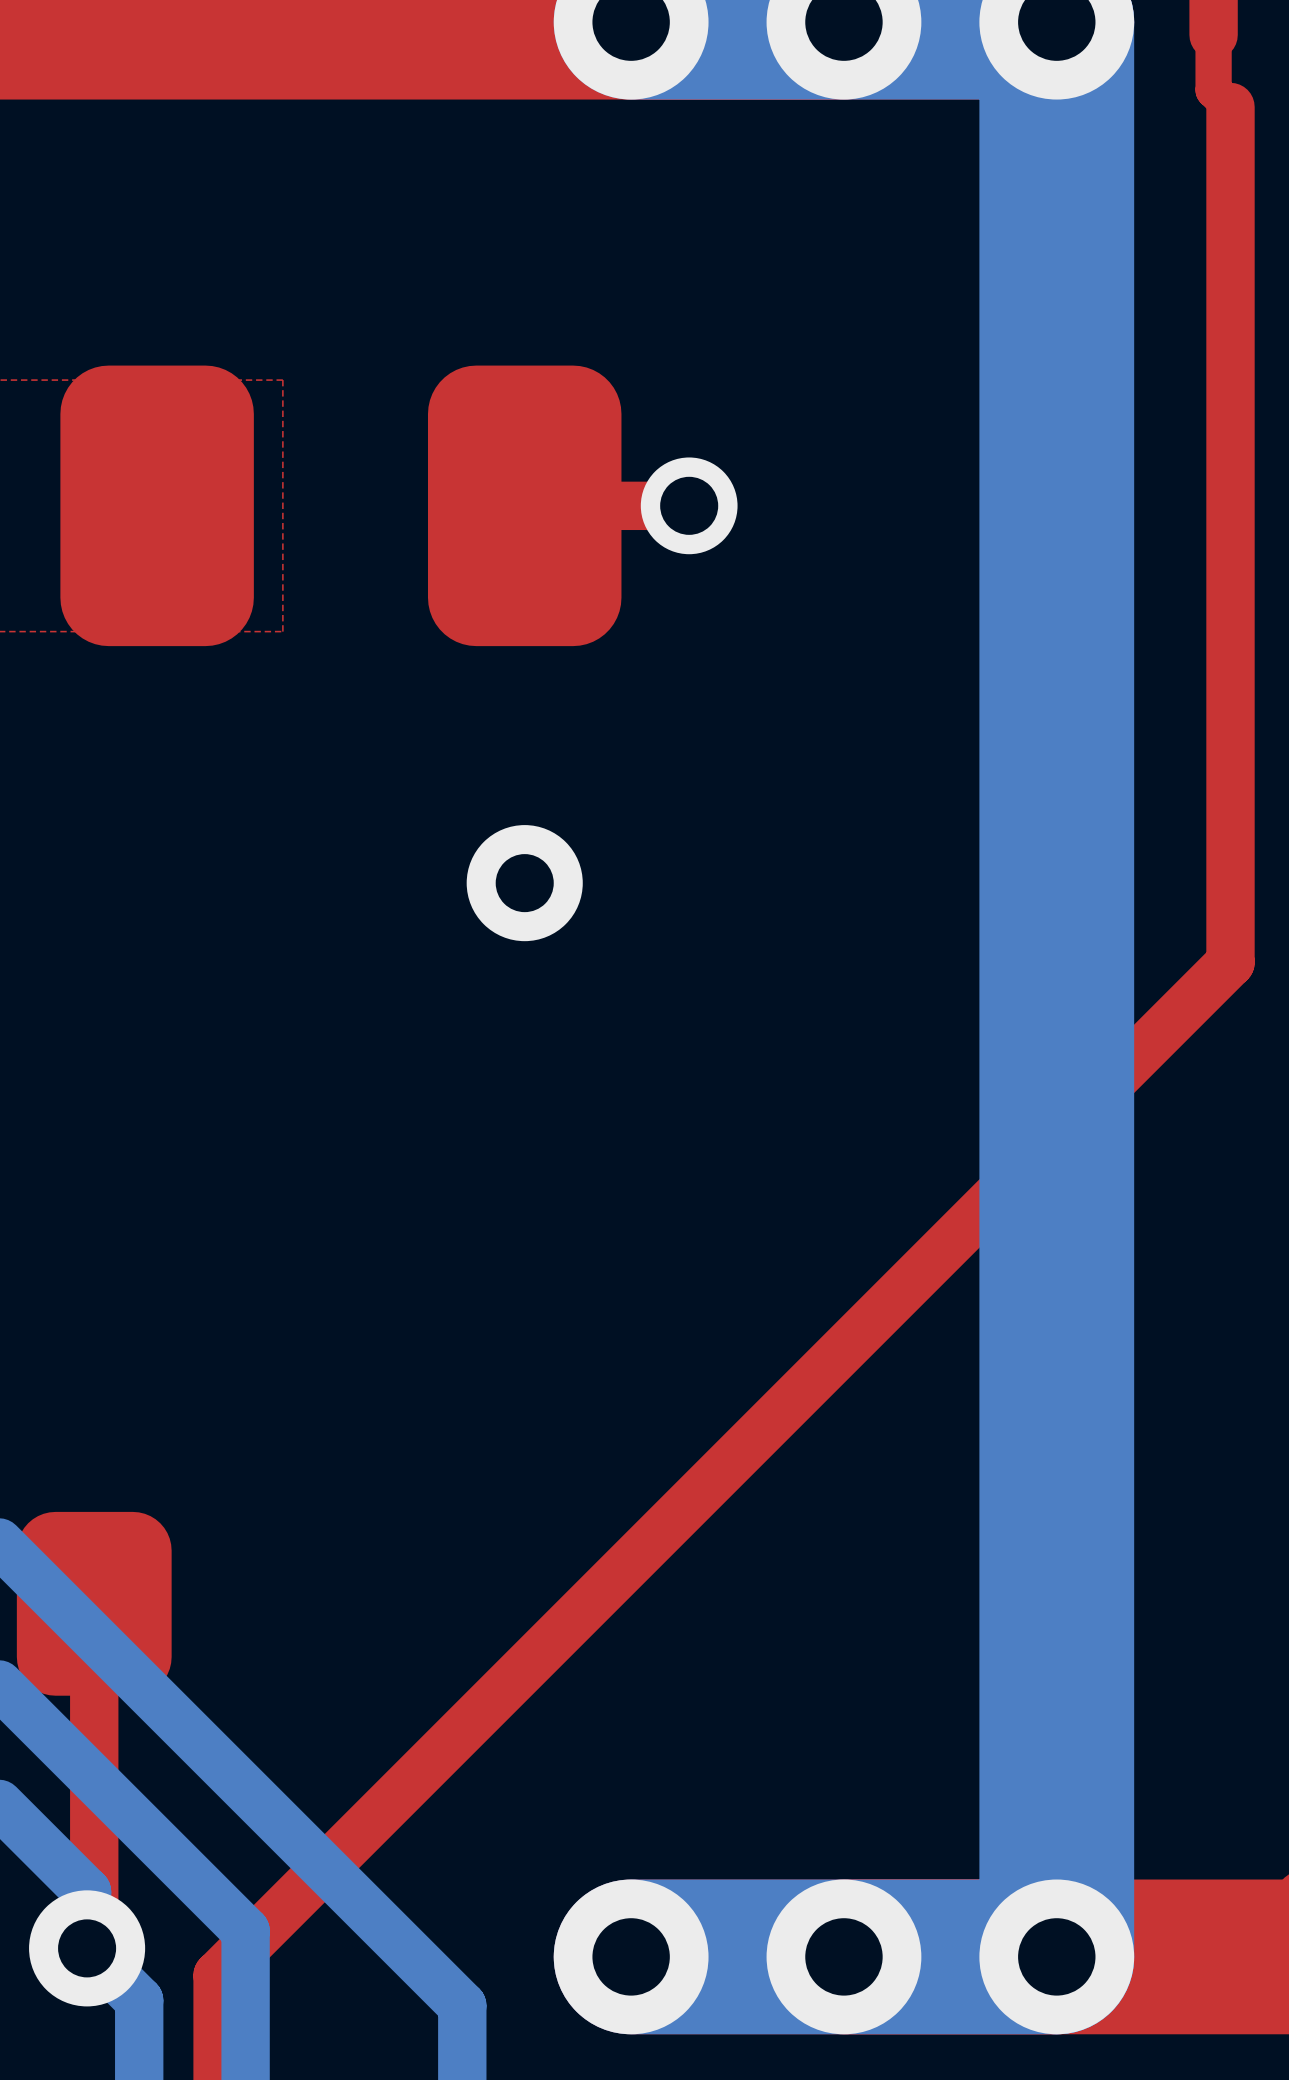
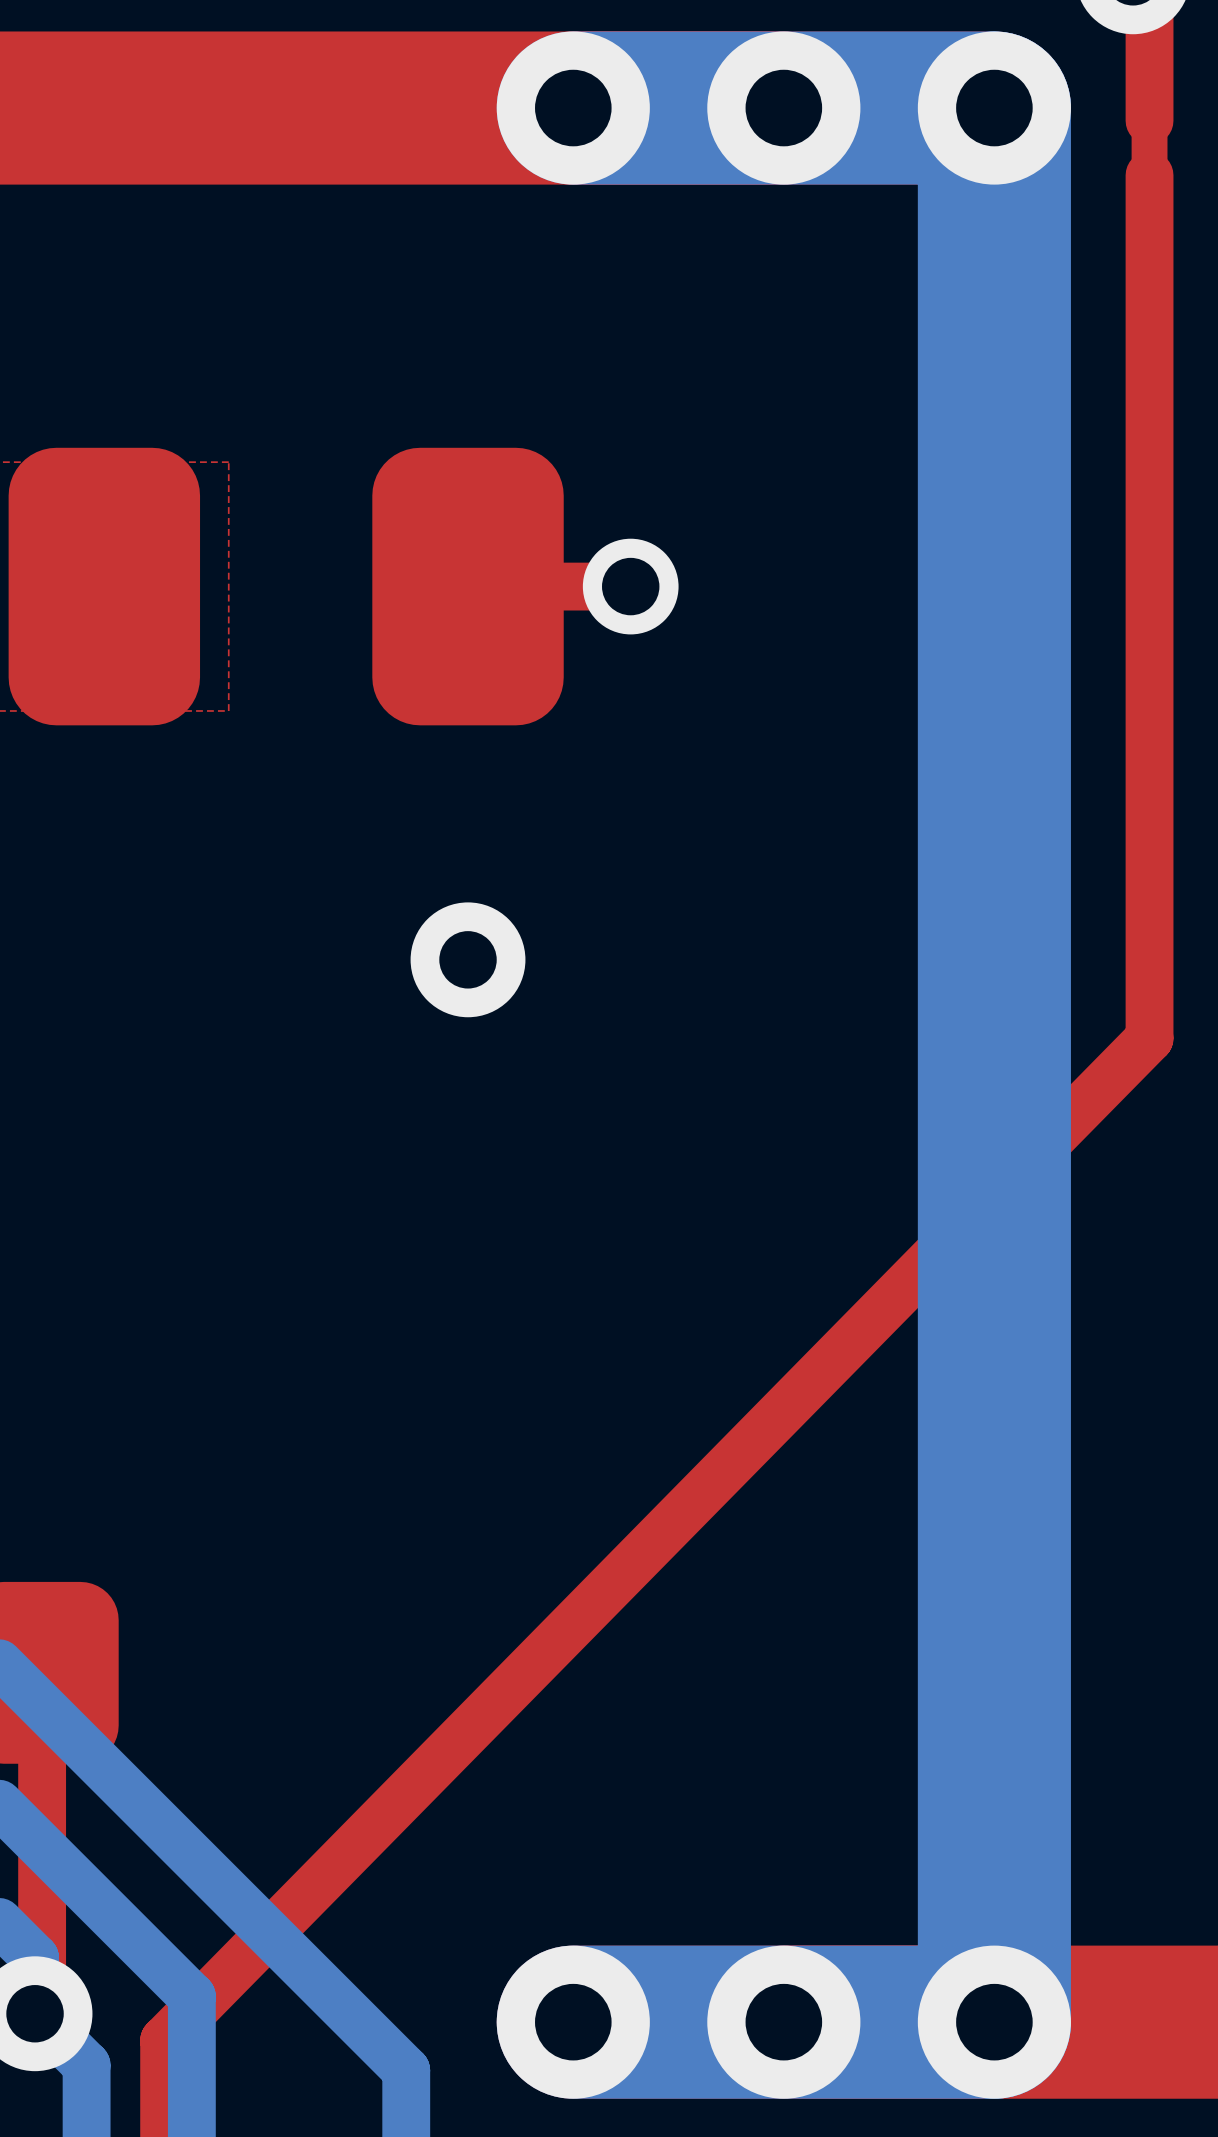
top track: (1213, 90) (1230, 106) (1230, 962) (217, 1975) -> (1149, 175) (1149, 1038) (164, 2040)

